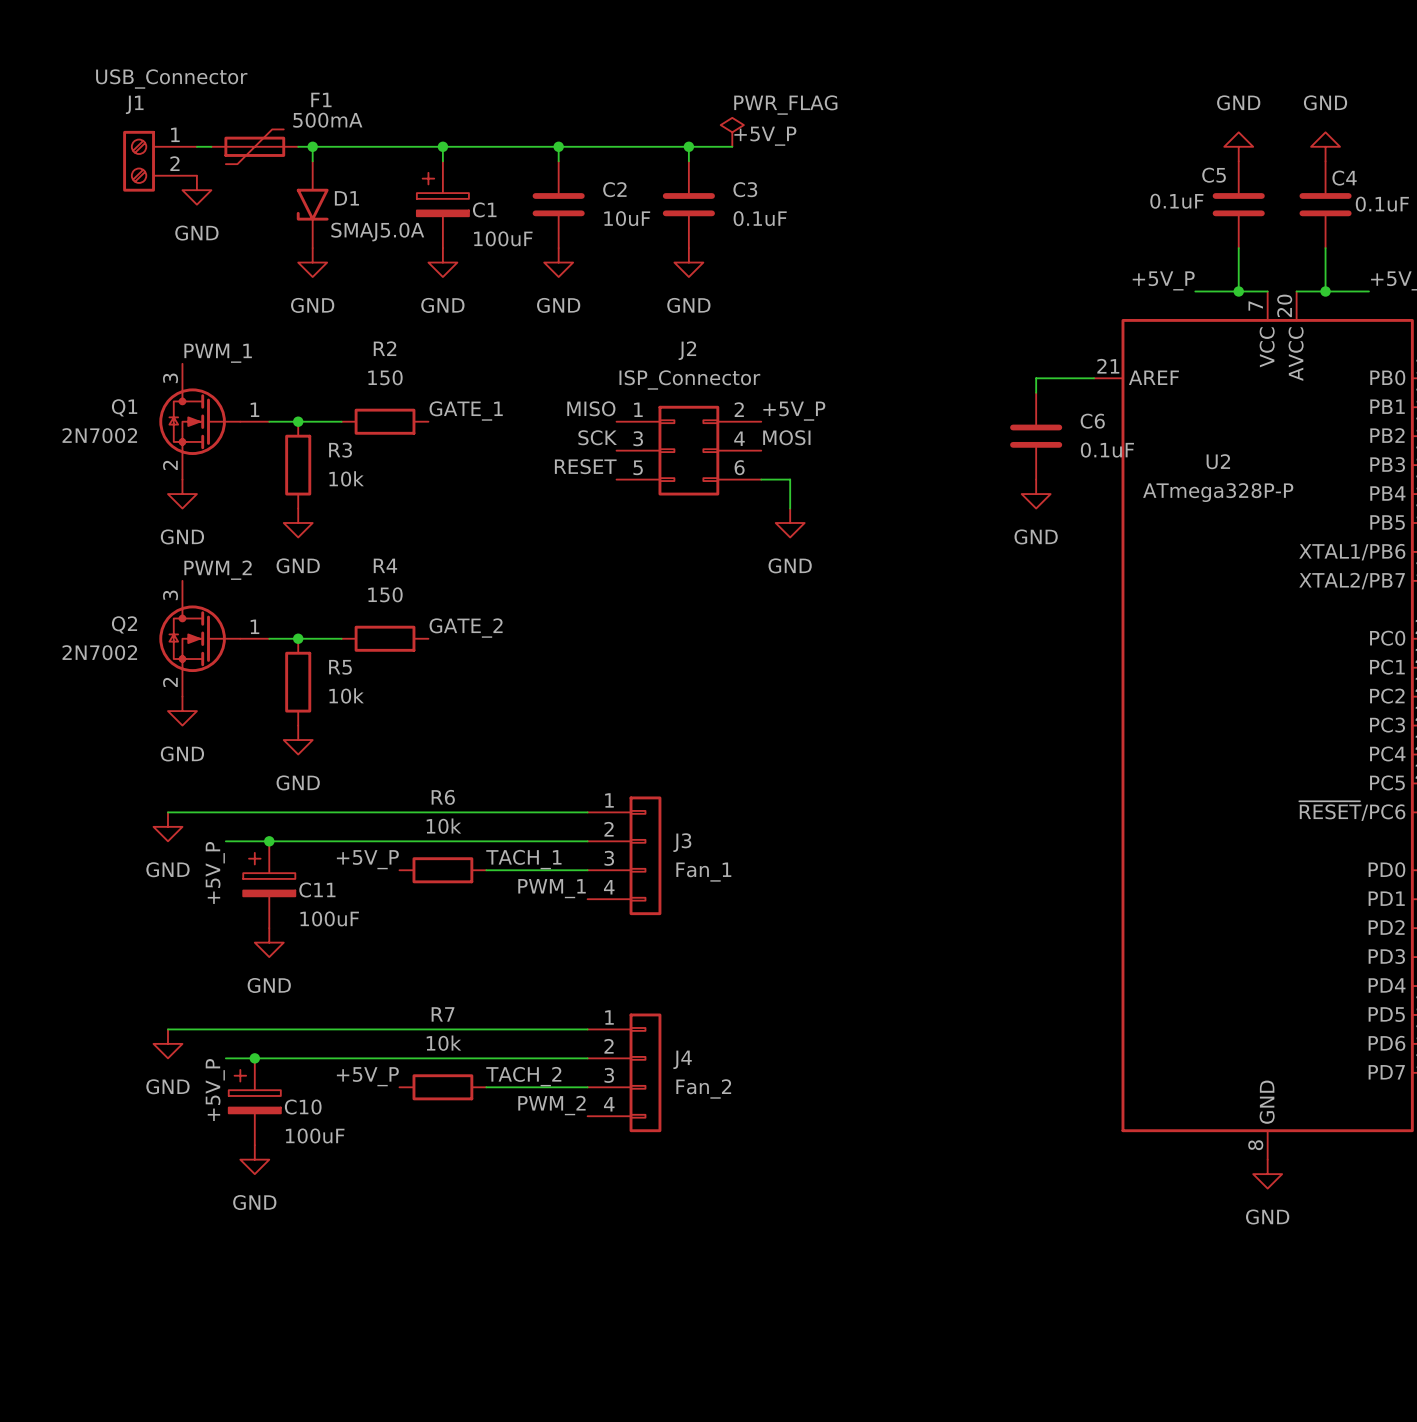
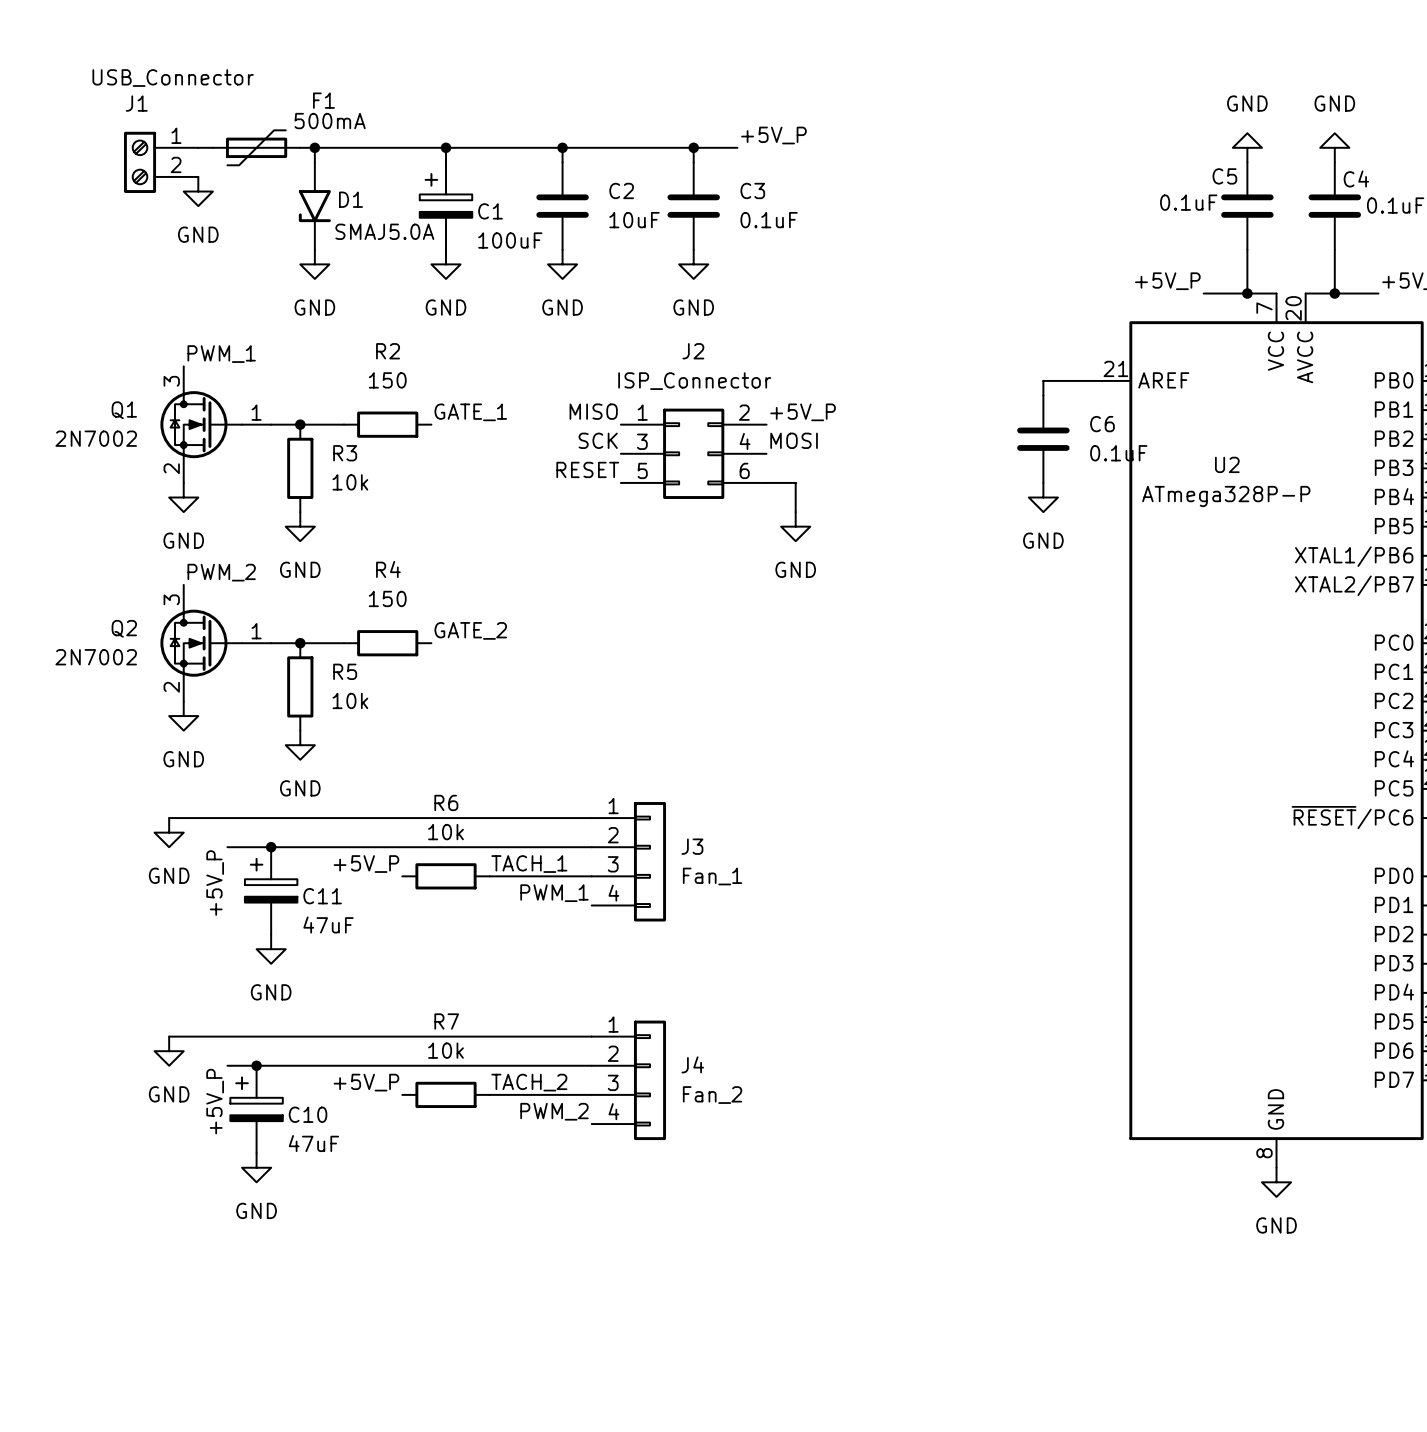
power symbol: PWR_FLAG (732, 132) -> none
C11 value: 100uF (329, 918) -> 47uF (328, 924)
C10 value: 100uF (315, 1135) -> 47uF (313, 1143)

